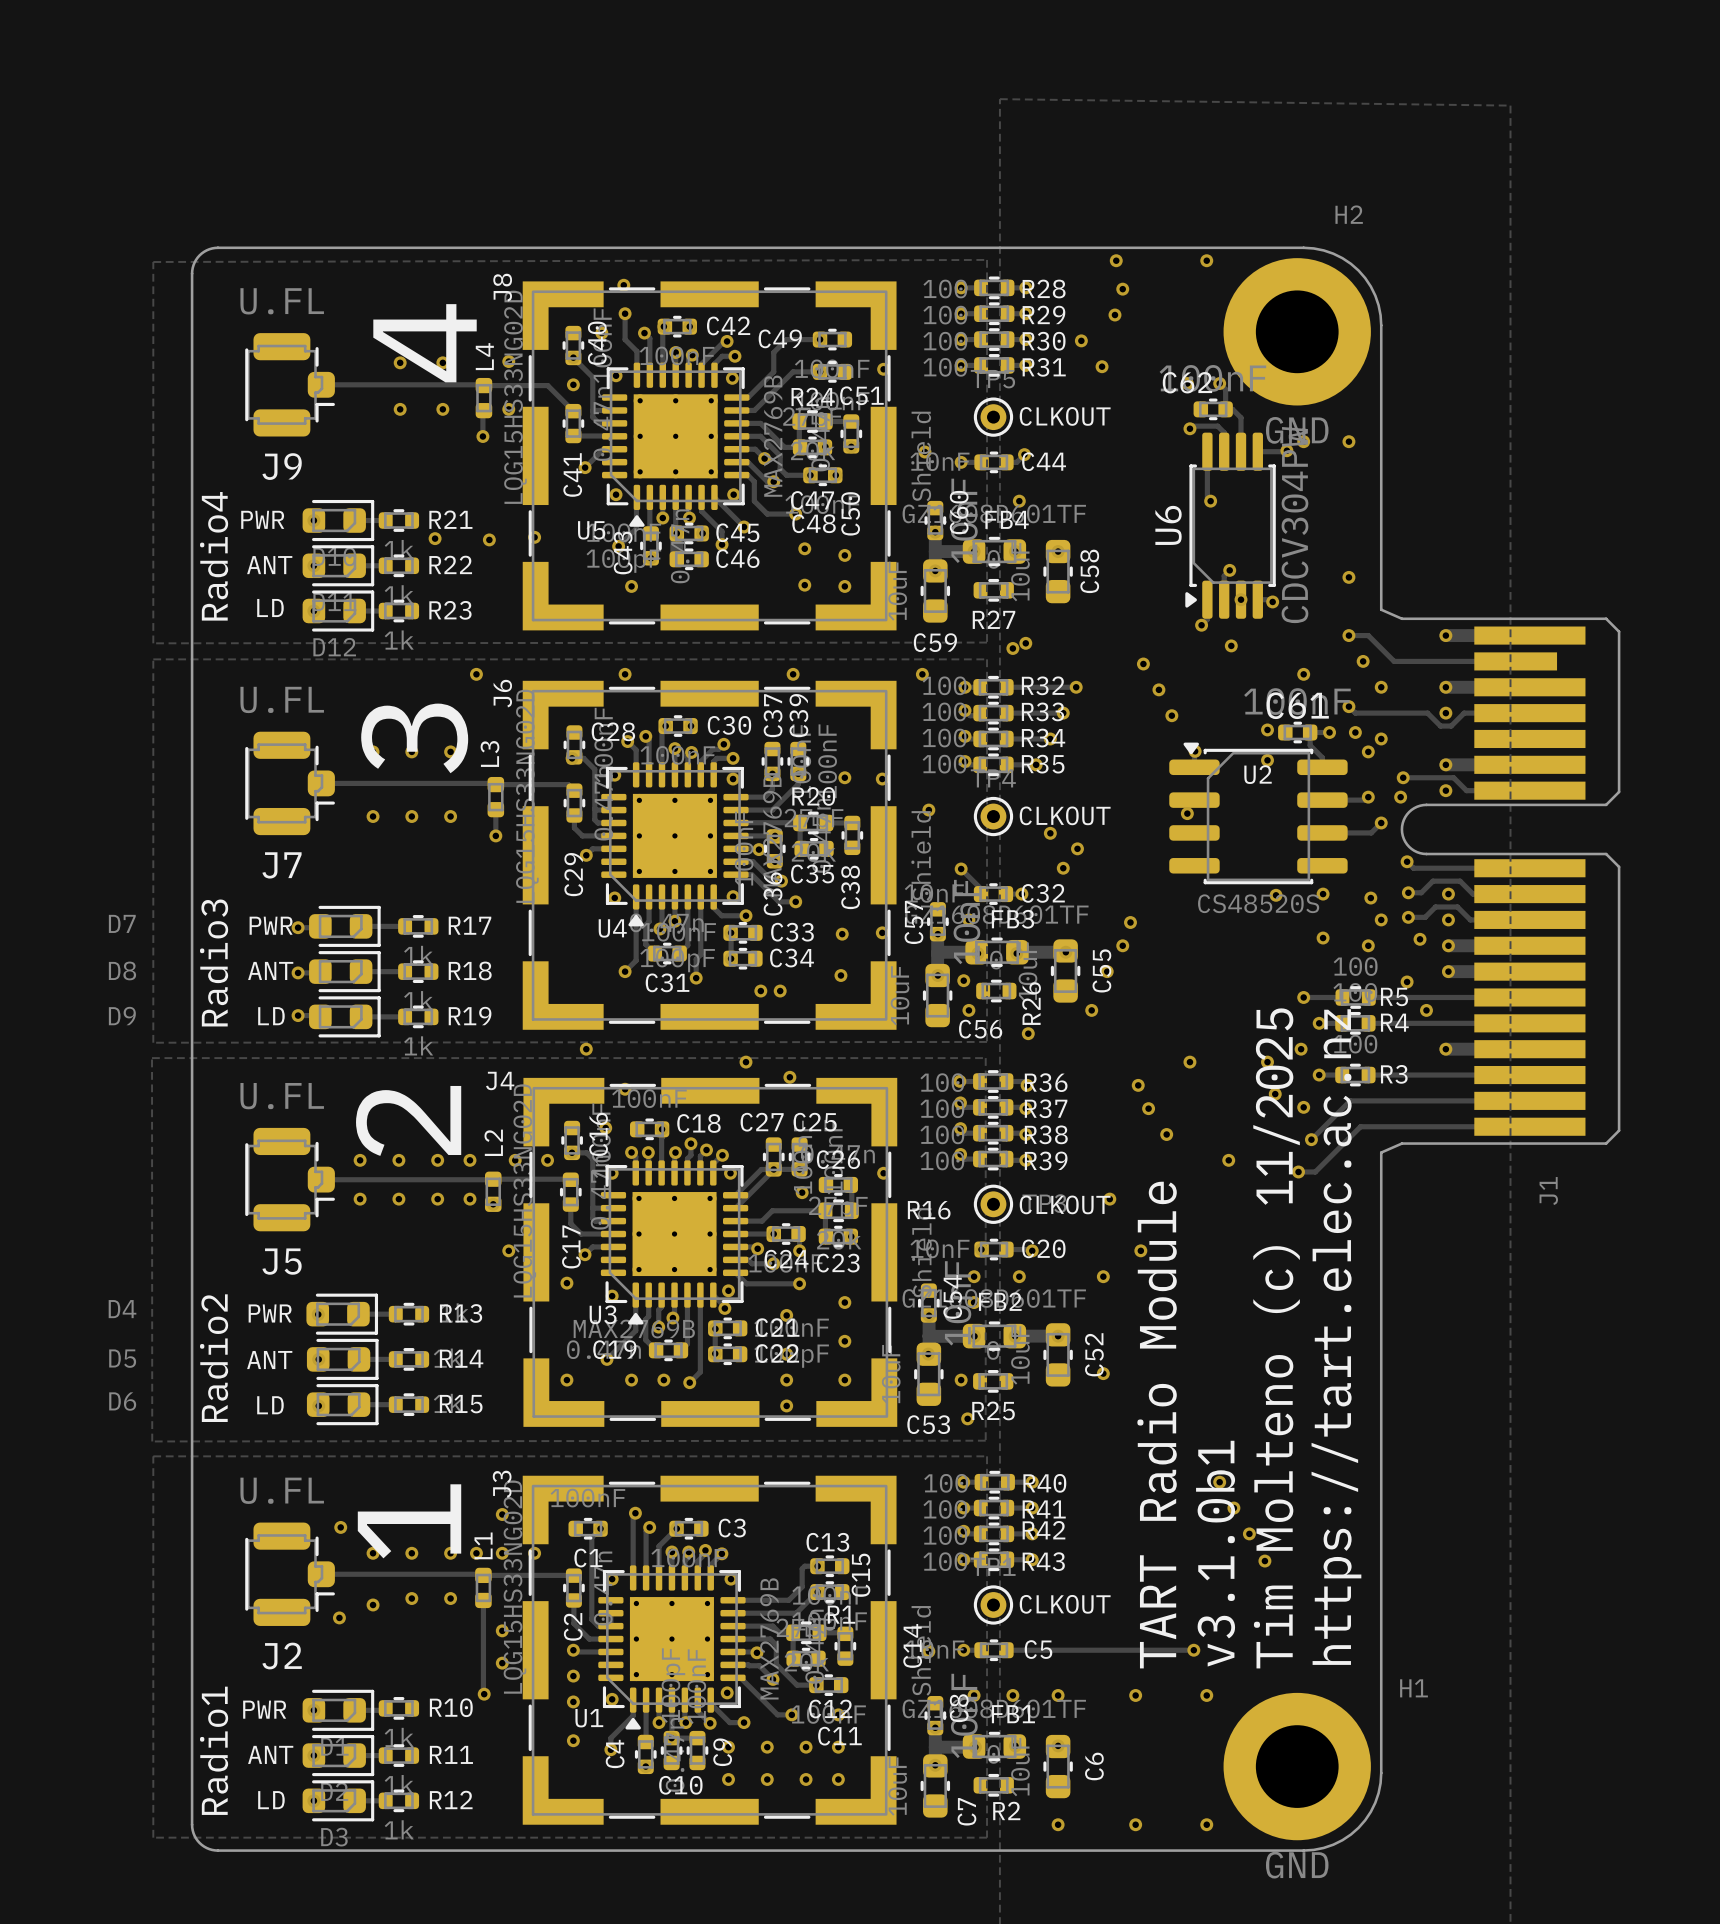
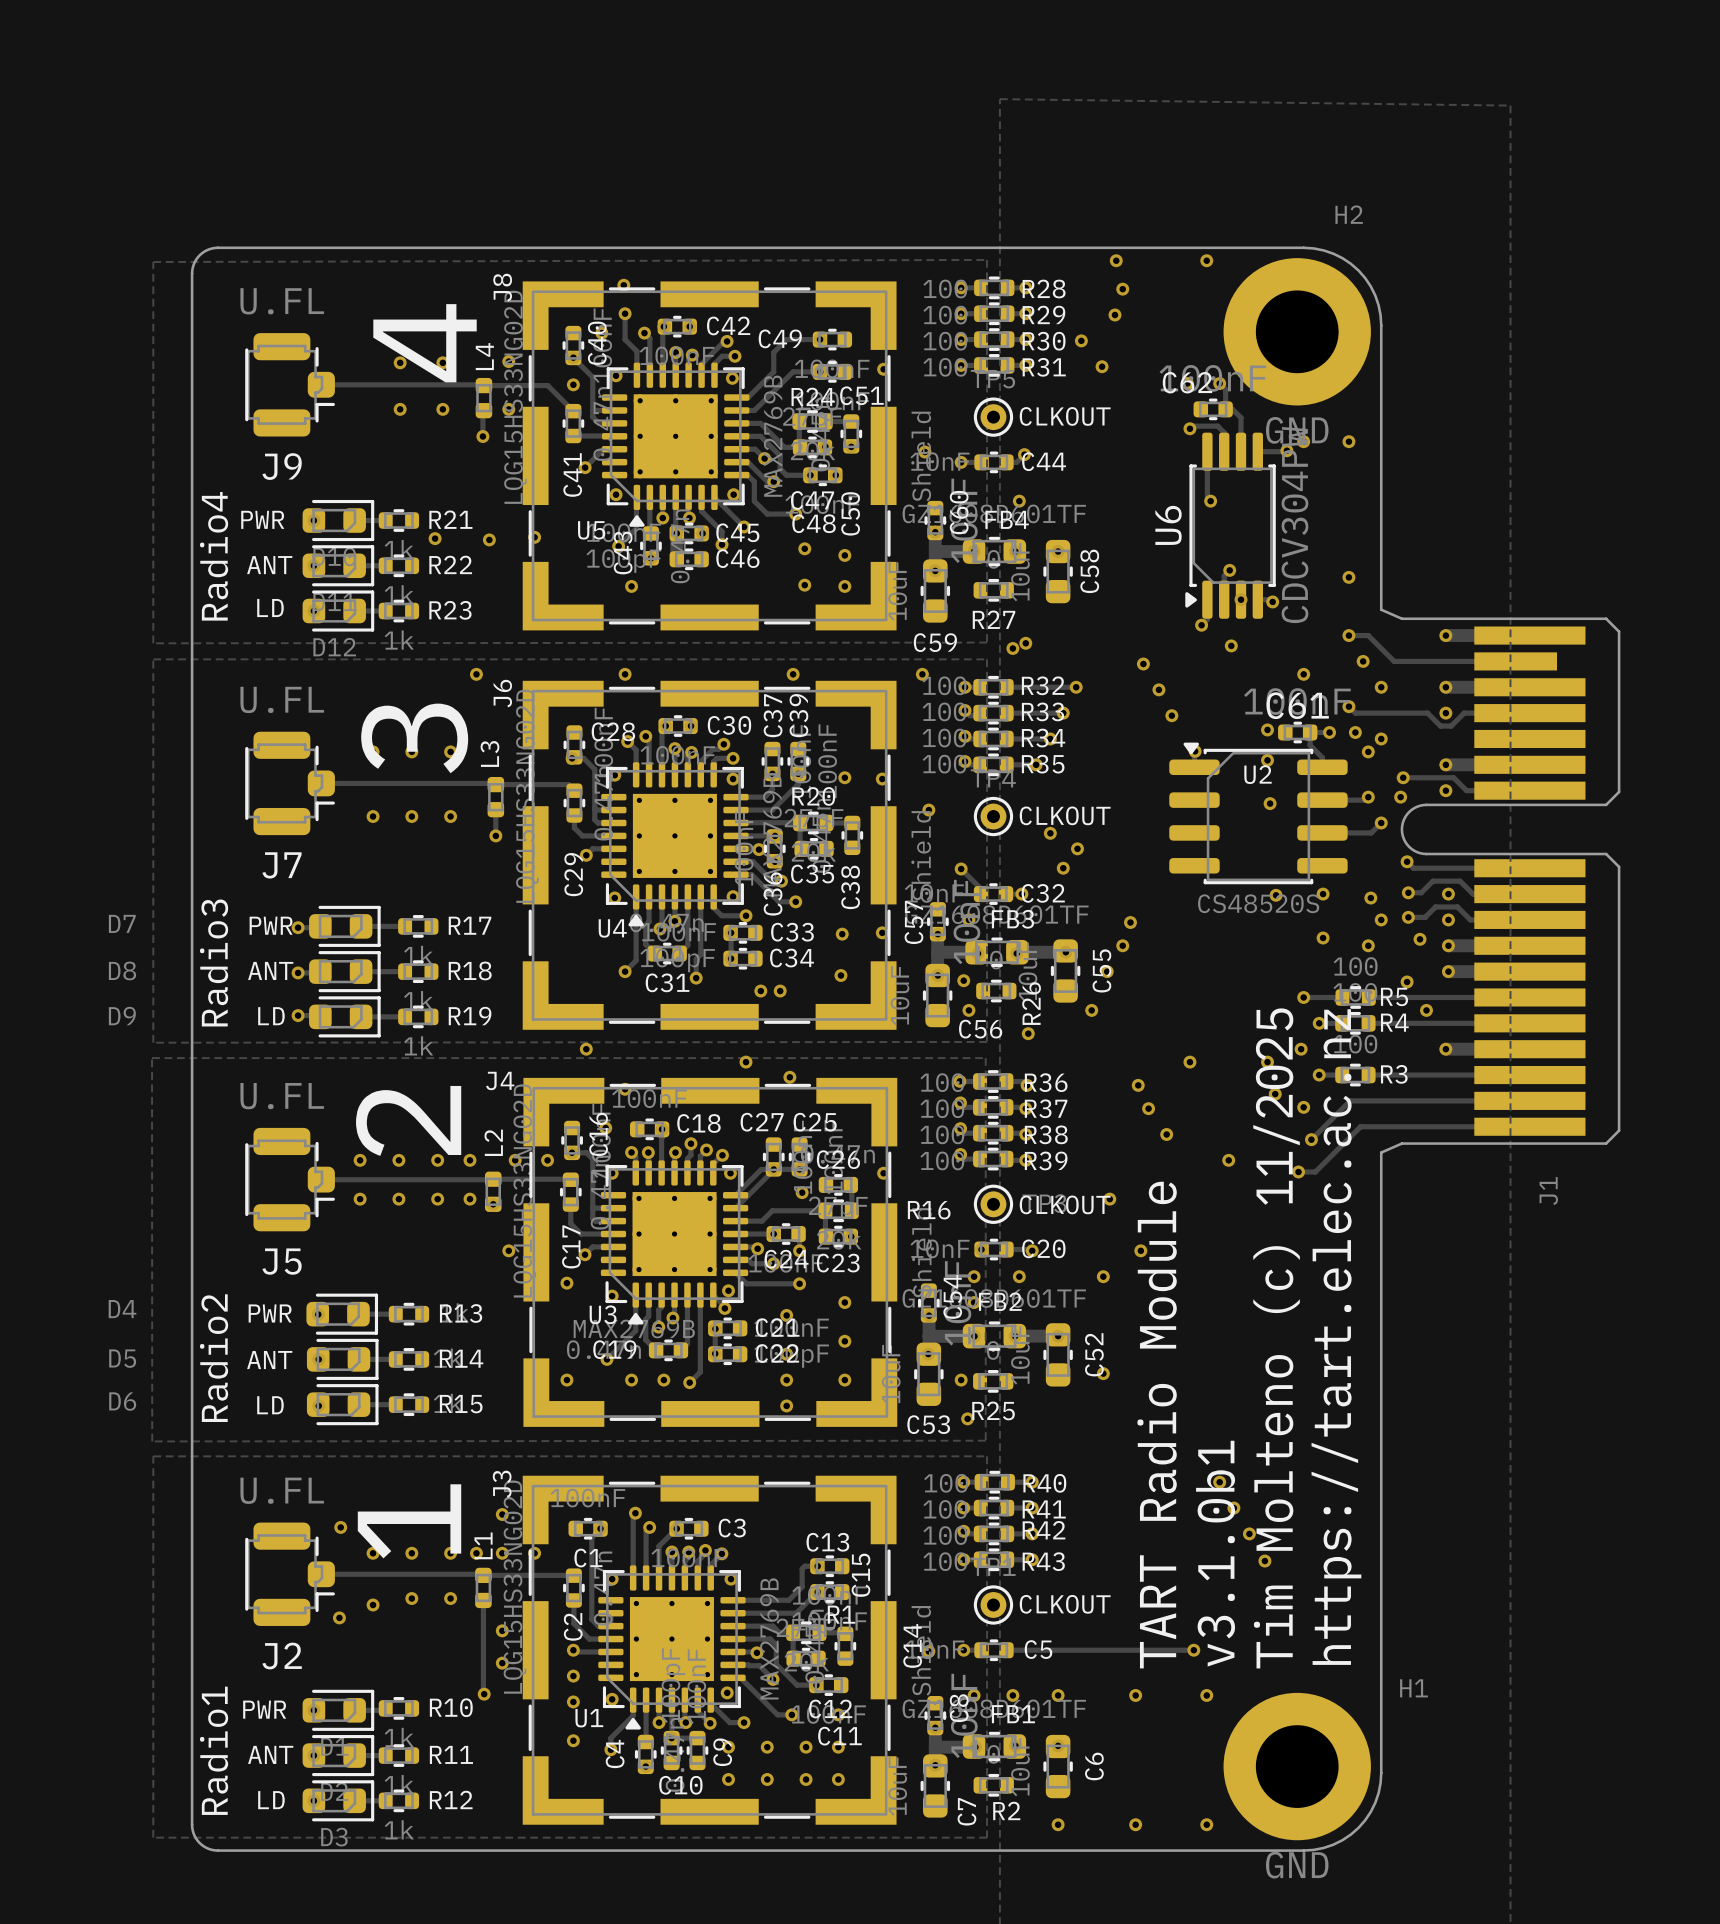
via position: (1187, 813) -> (1270, 803)

